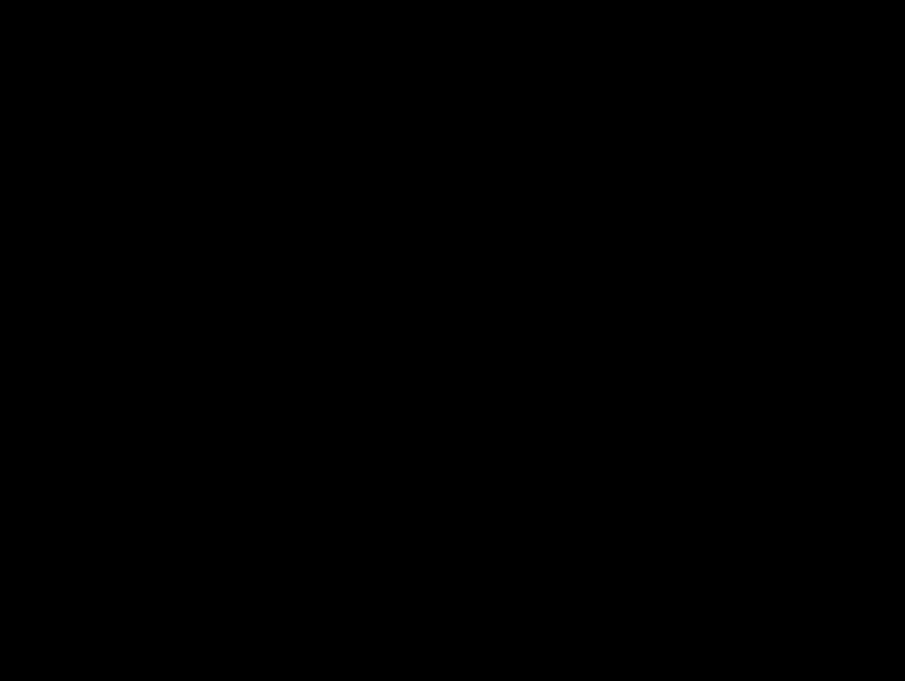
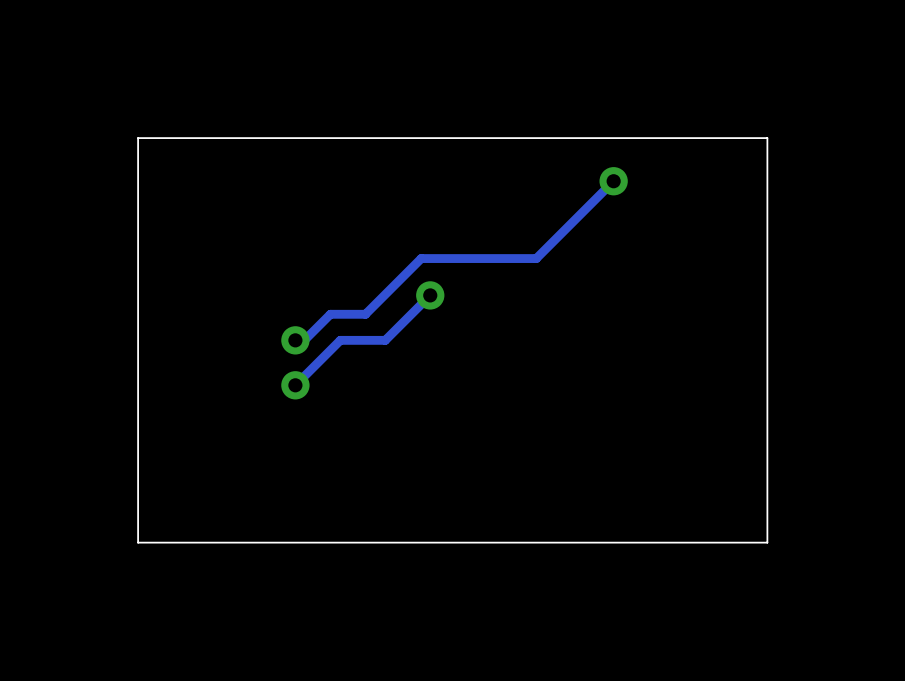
board edge: none -> (767, 138) (767, 542) (138, 542) (138, 138) (767, 138)
track: none -> (613, 181) (536, 258) (421, 258) (365, 314) (330, 314) (304, 340) (295, 340)
via: none -> (613, 181)
track: none -> (430, 295) (385, 340) (340, 340) (295, 385)
via: none -> (430, 295)
via: none -> (295, 340)
via: none -> (295, 385)

